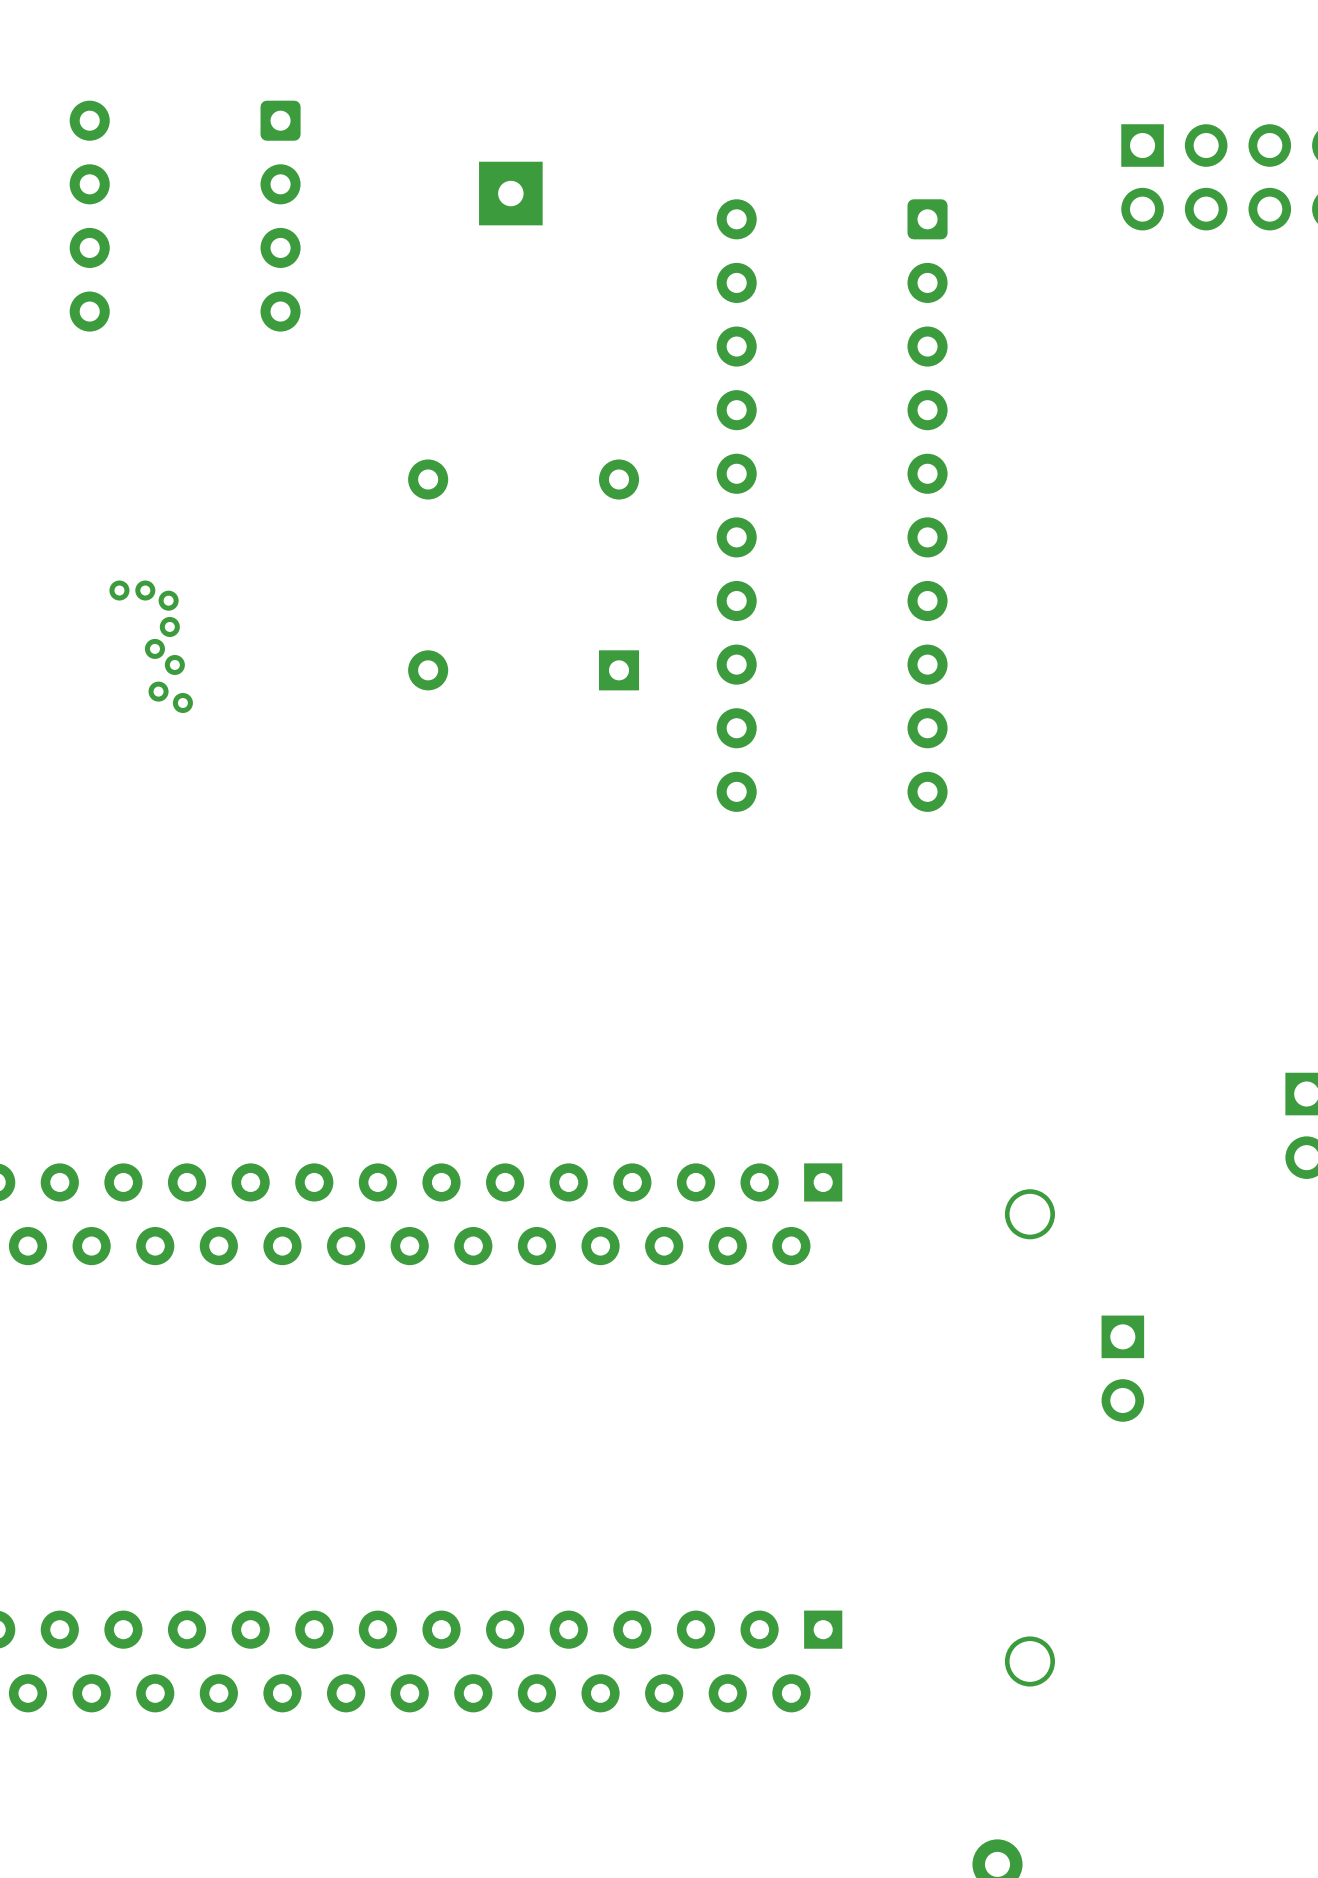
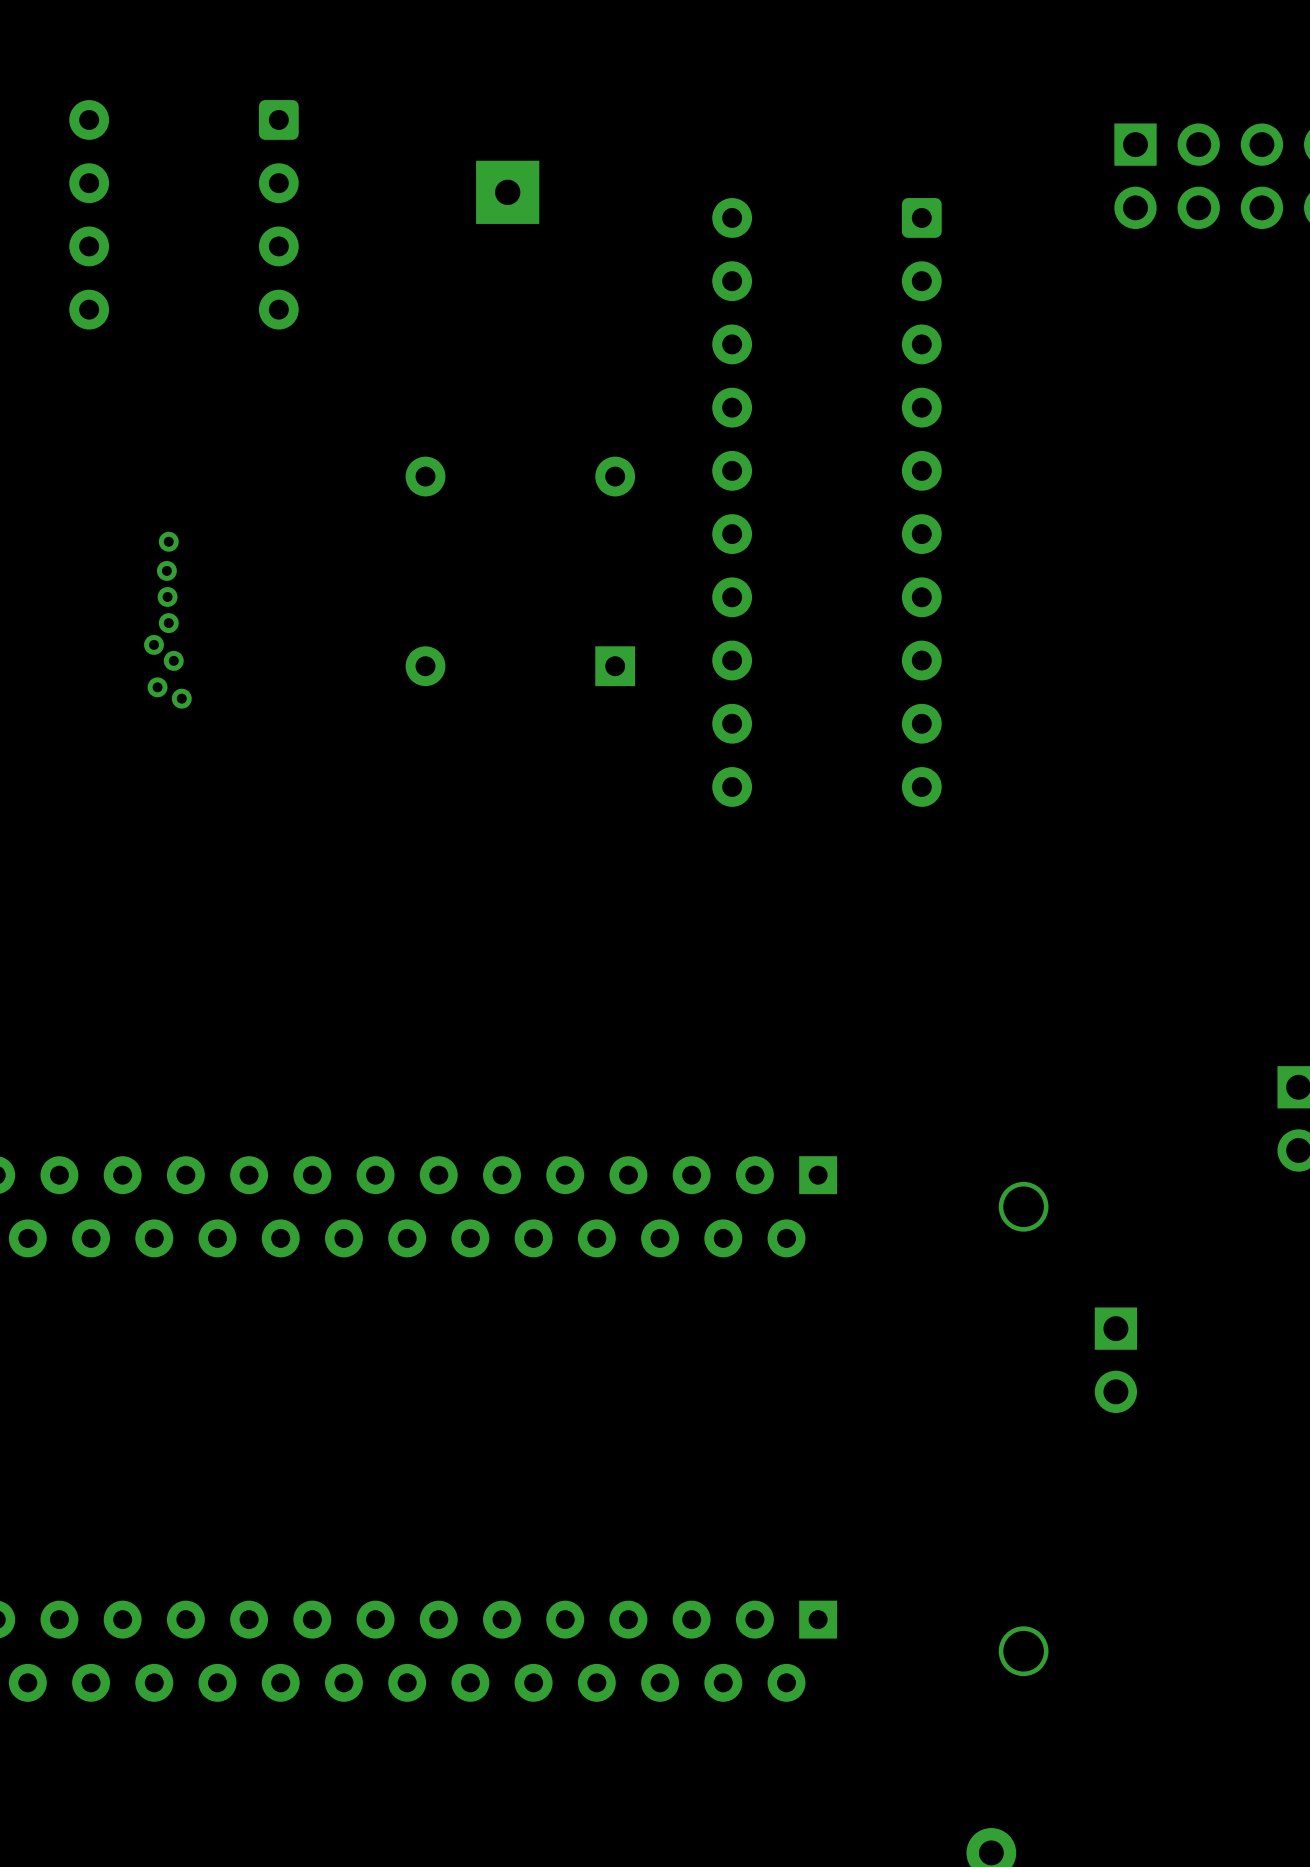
via: none -> (168, 541)
via: none -> (166, 570)
via: (119, 590) -> none
via: (145, 590) -> none

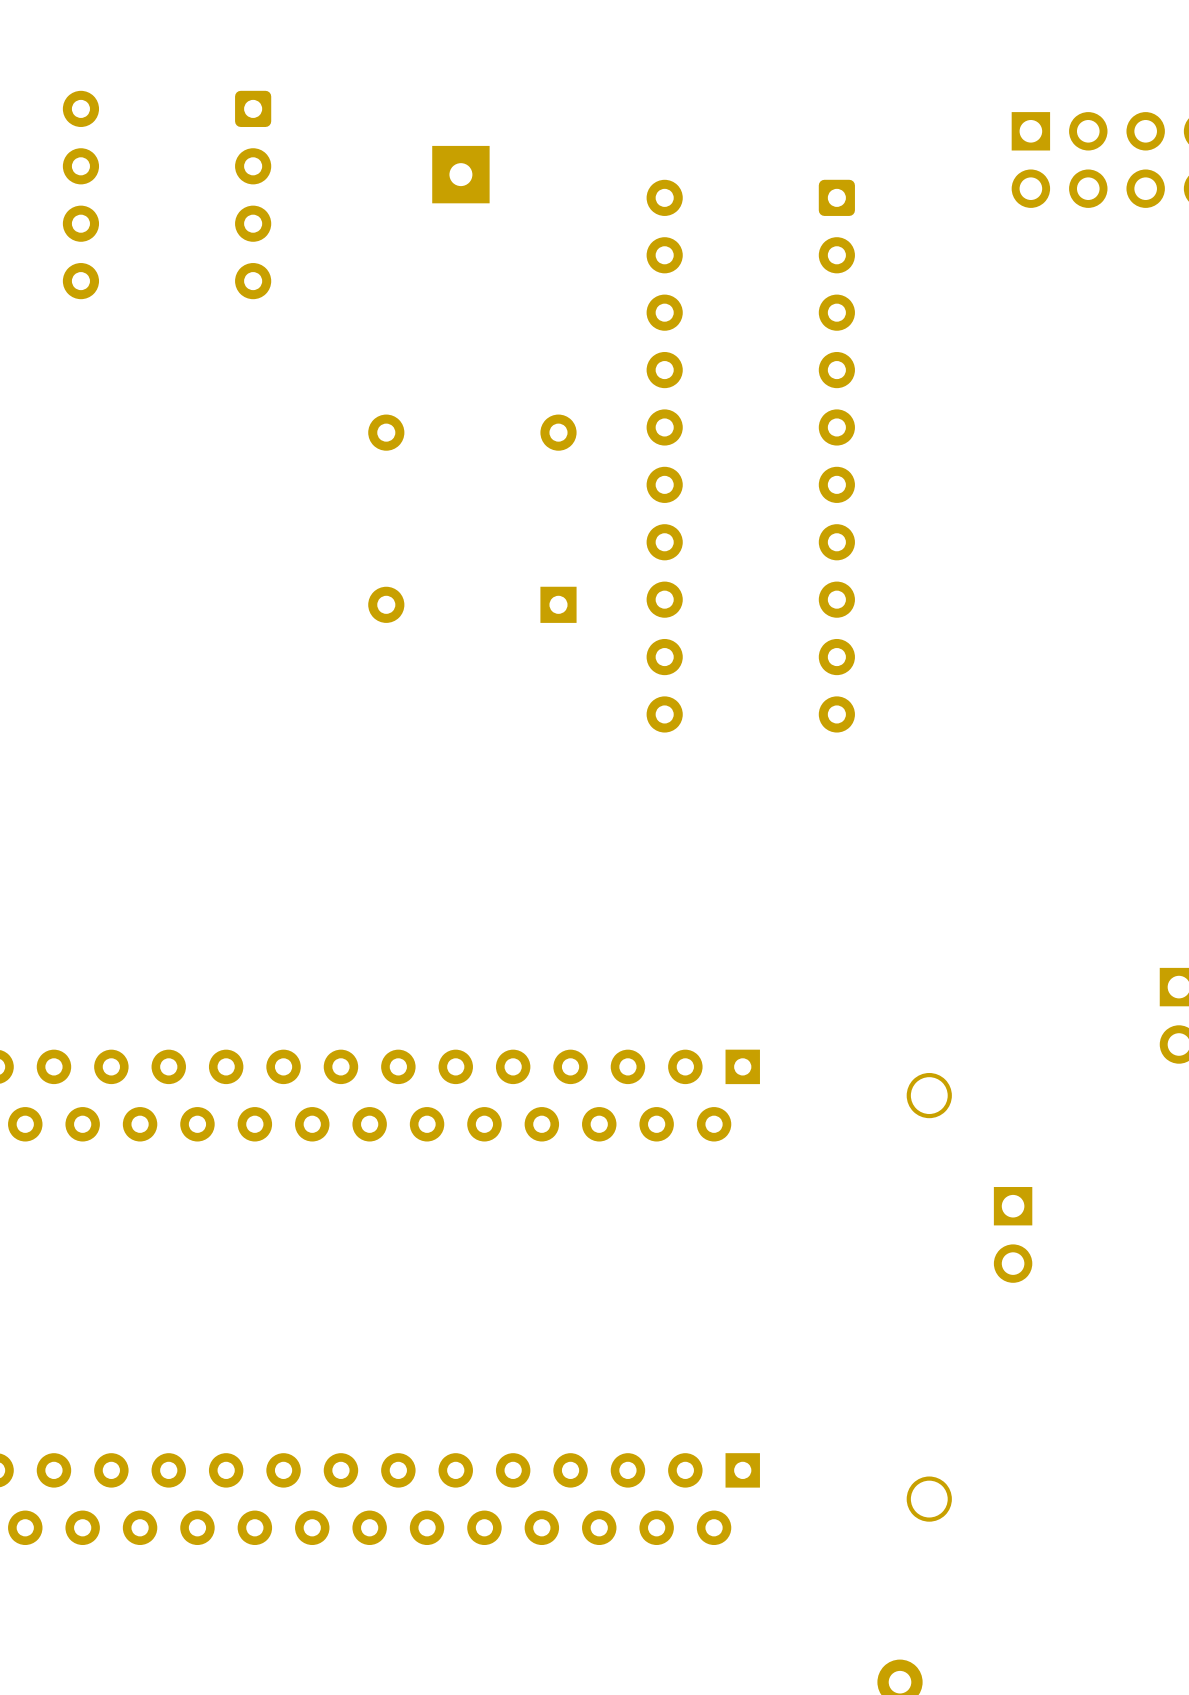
via: (168, 541) -> none
via: (166, 570) -> none
via: (167, 596) -> none
via: (168, 623) -> none
via: (154, 644) -> none
via: (173, 660) -> none
via: (157, 687) -> none
via: (181, 698) -> none

